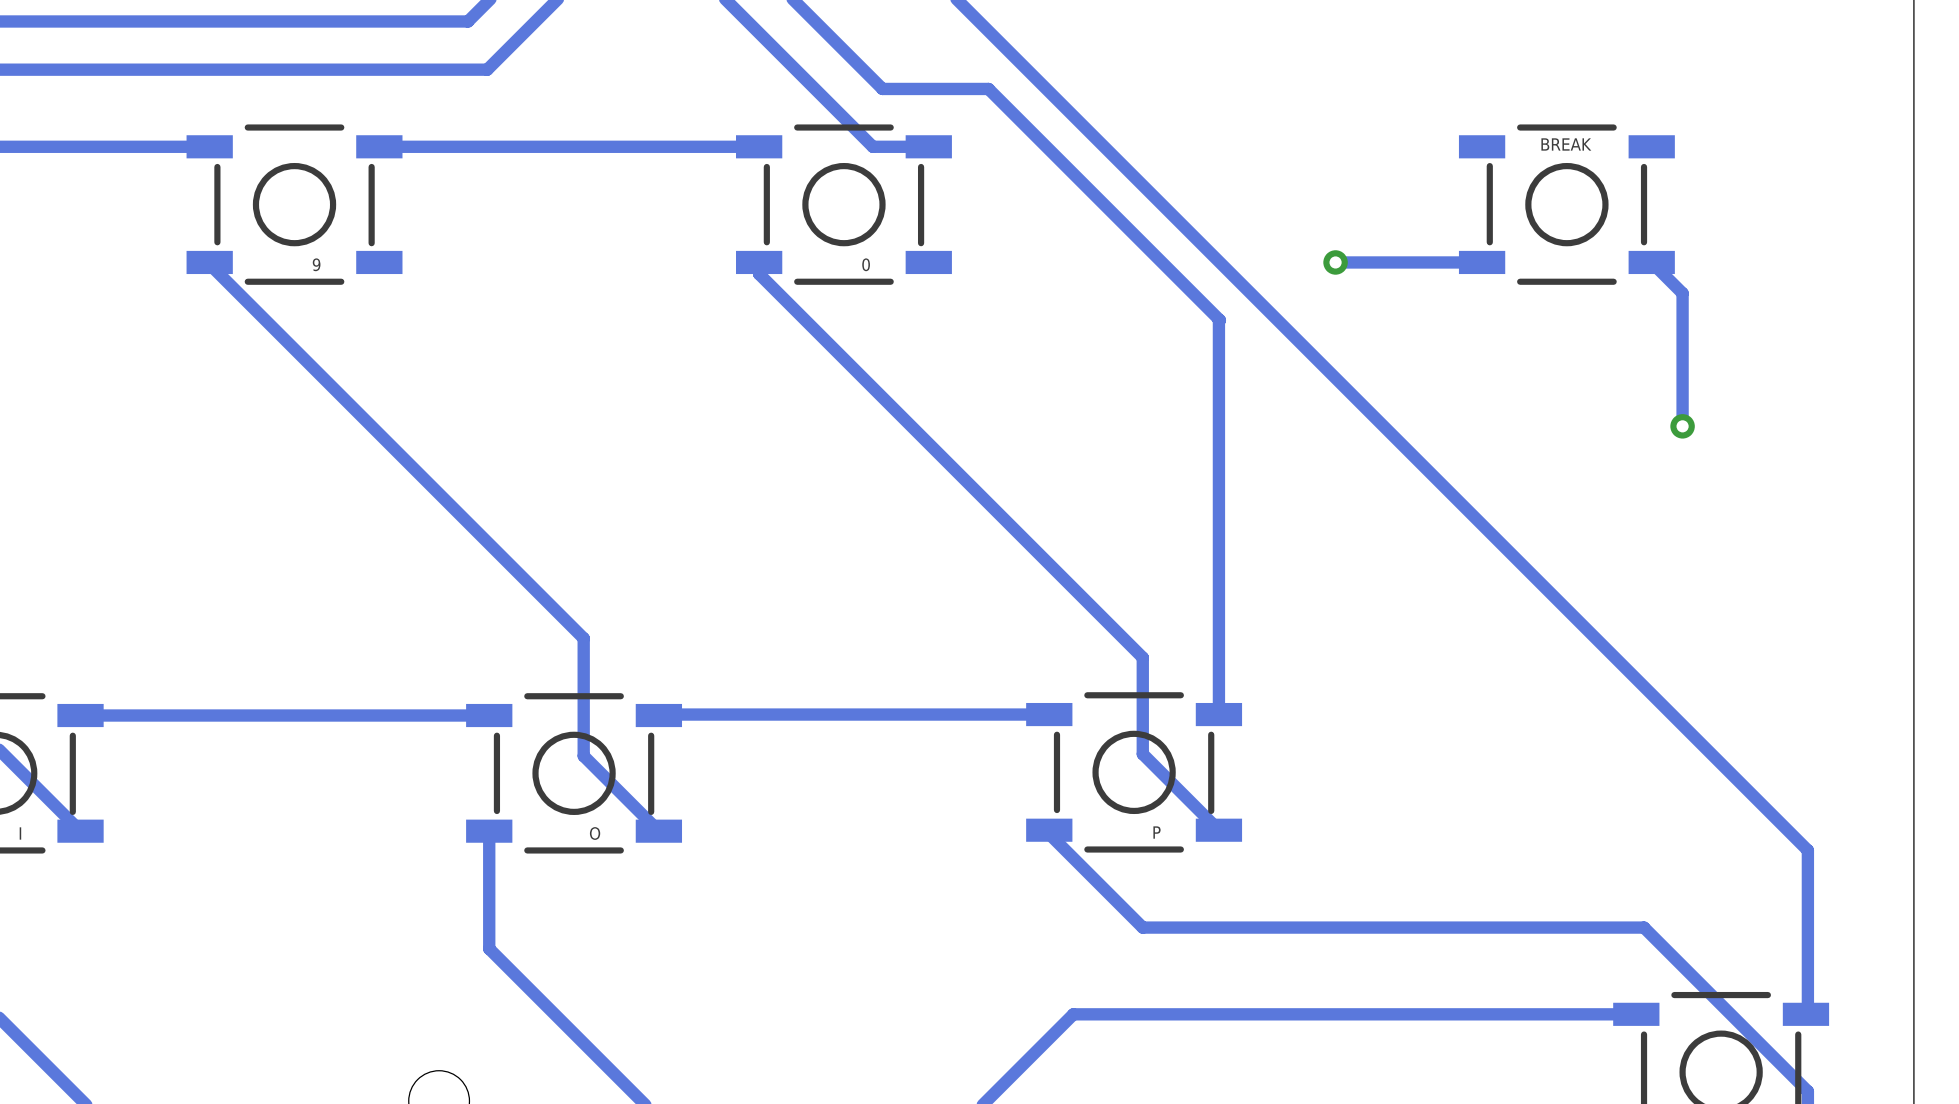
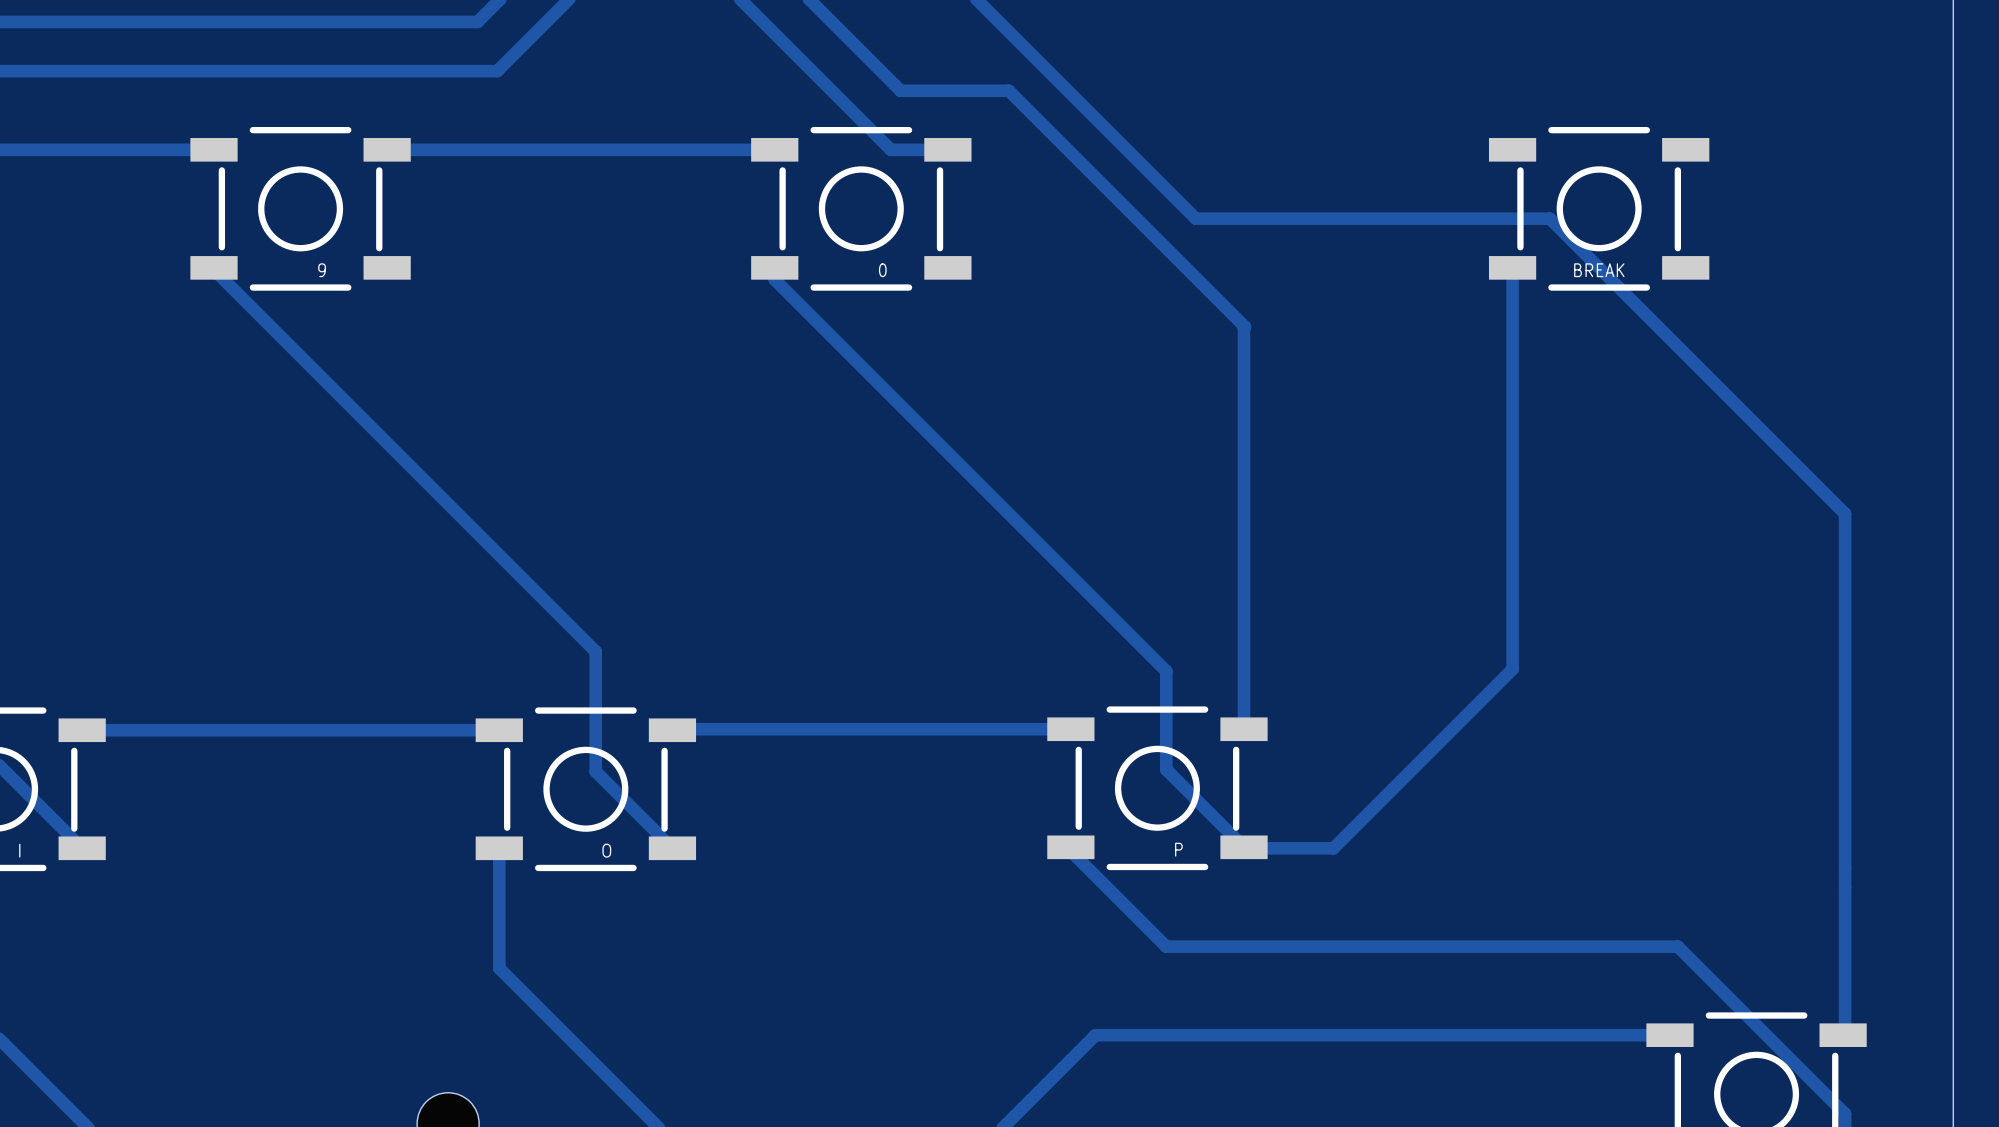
BREAK rotation: 0° (1566, 204) -> 180° (1599, 208)
track: (1171, 214) (1807, 850) -> (1195, 218) (1549, 218) (1845, 513) (1845, 867)
via: (1335, 262) -> none
track: (1482, 262) (1335, 262) -> (1512, 267) (1512, 669) (1333, 848) (1244, 847)
track: (1651, 262) (1682, 293) (1682, 426) -> none
via: (1682, 426) -> none

